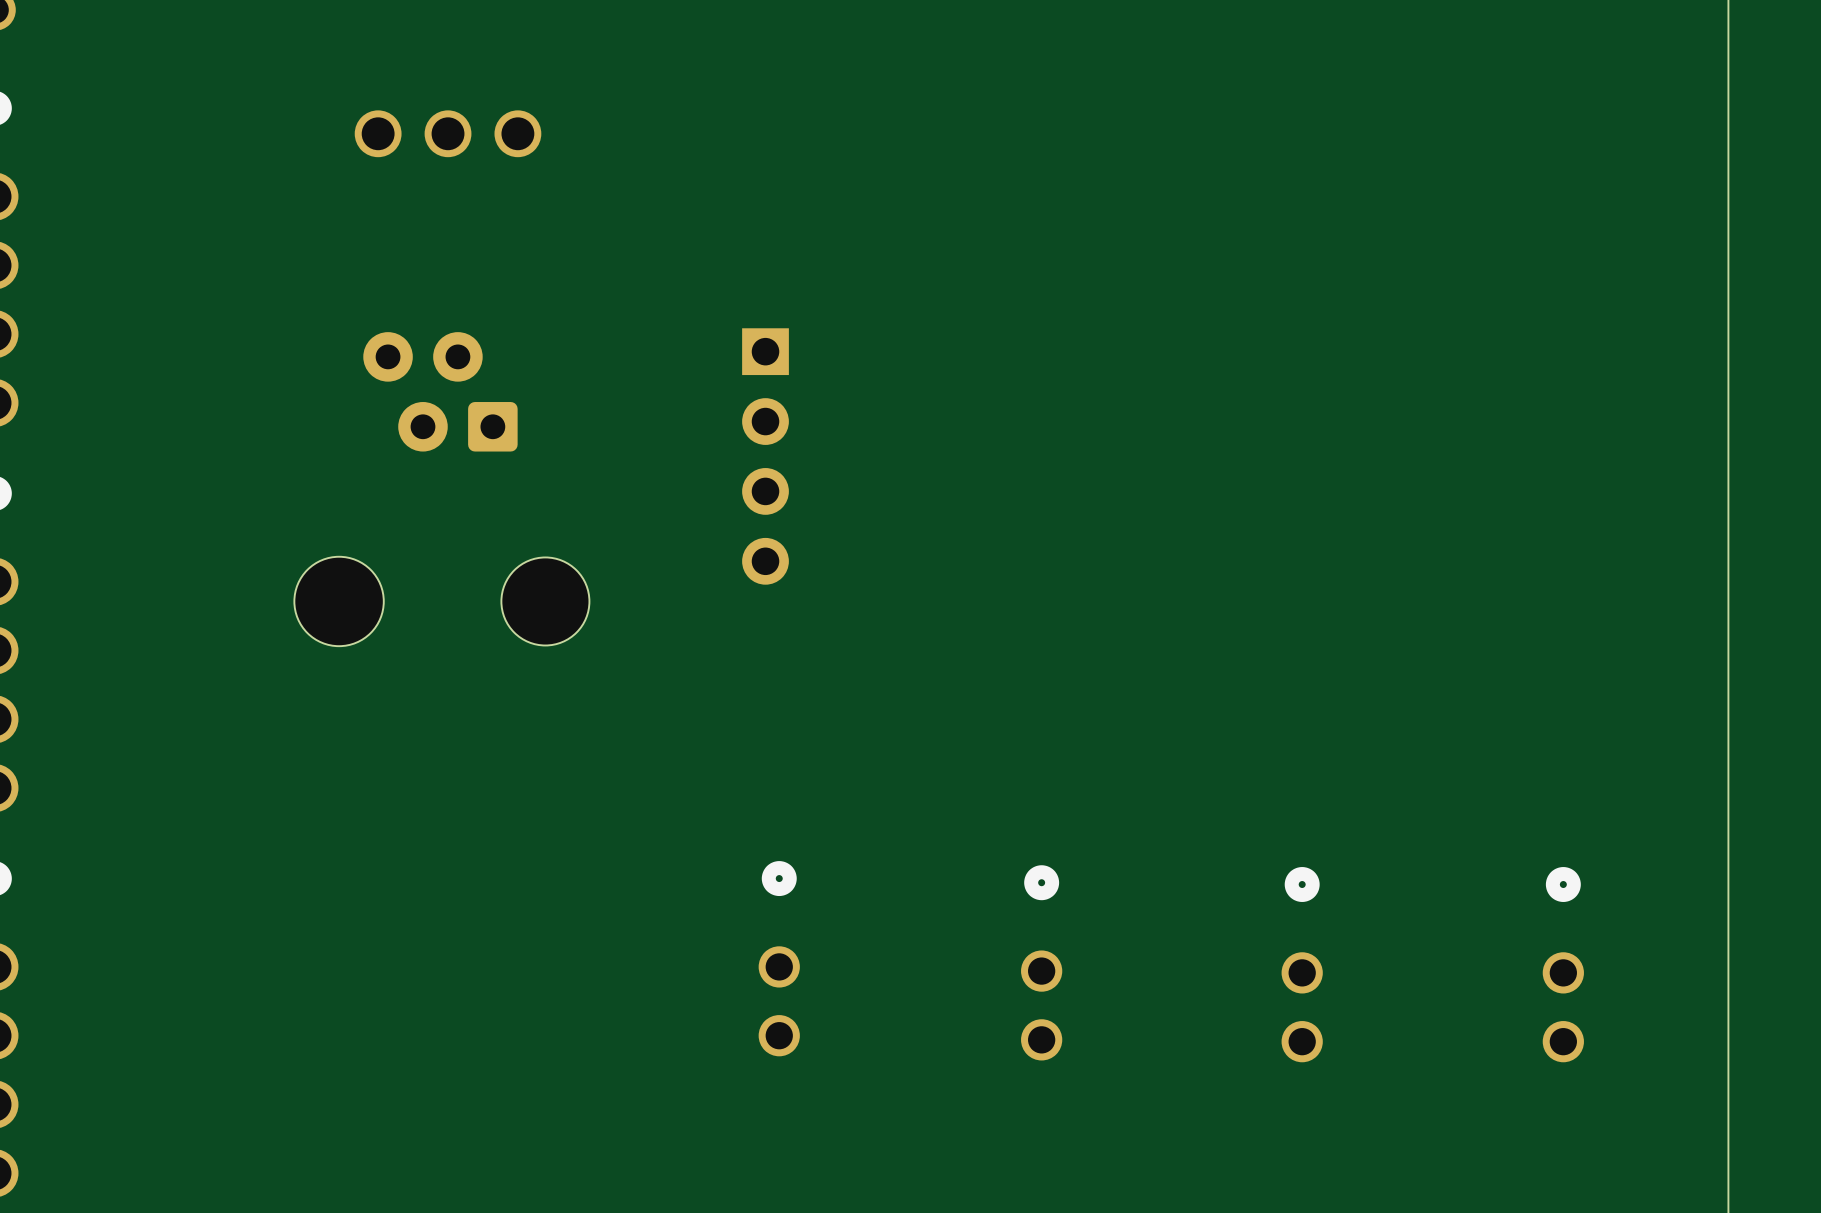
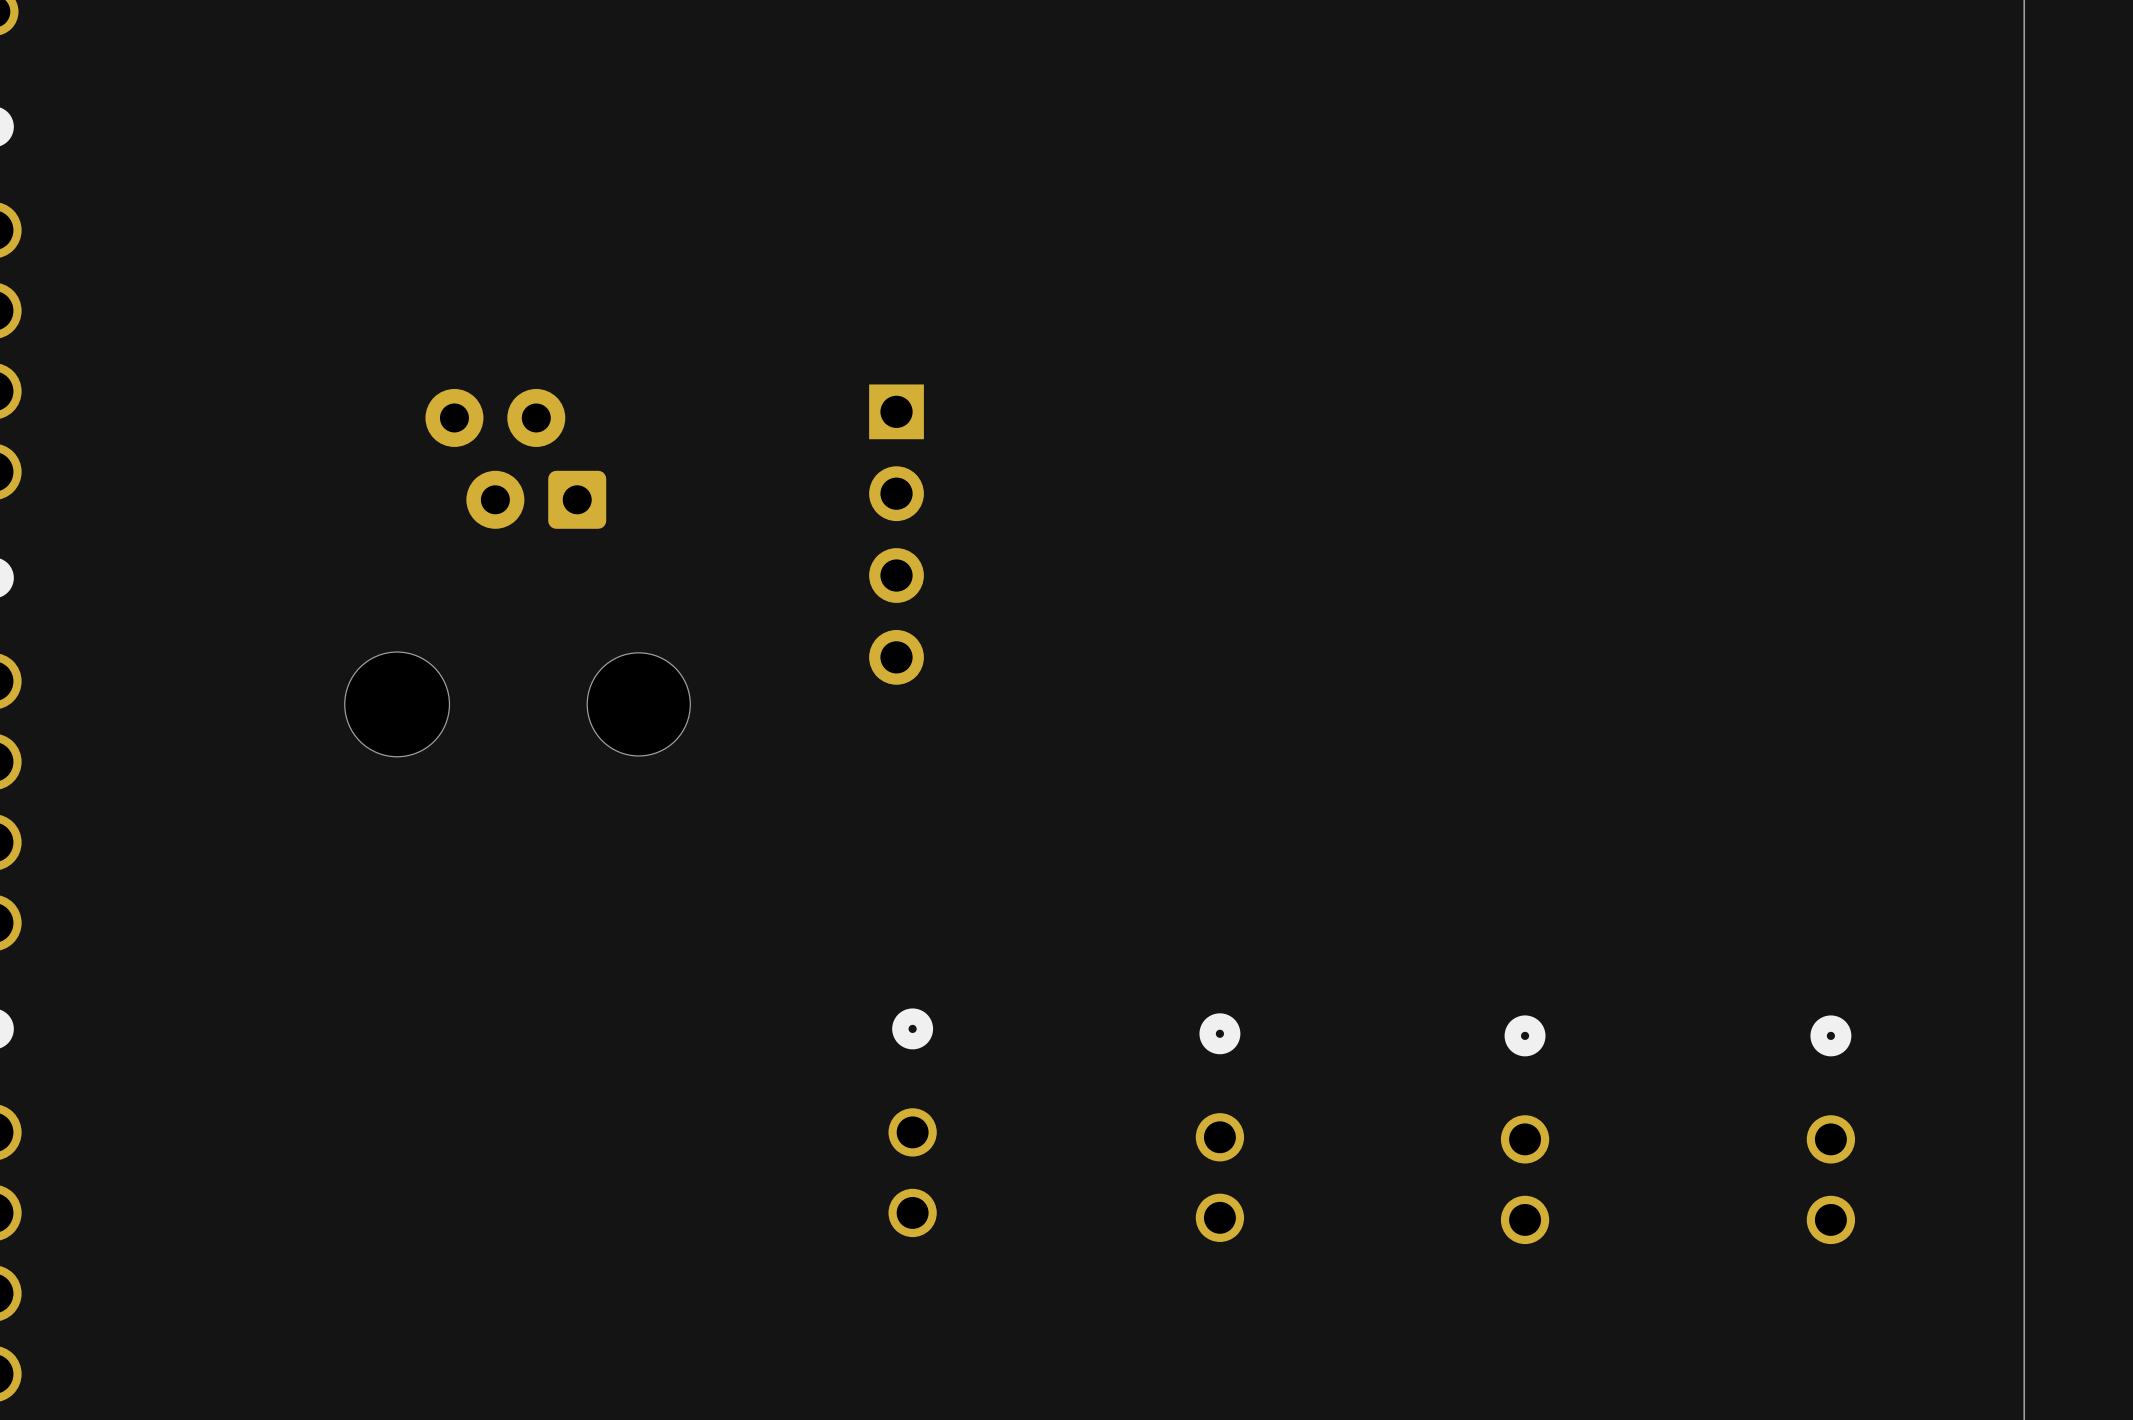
part: (448, 133) -> none

